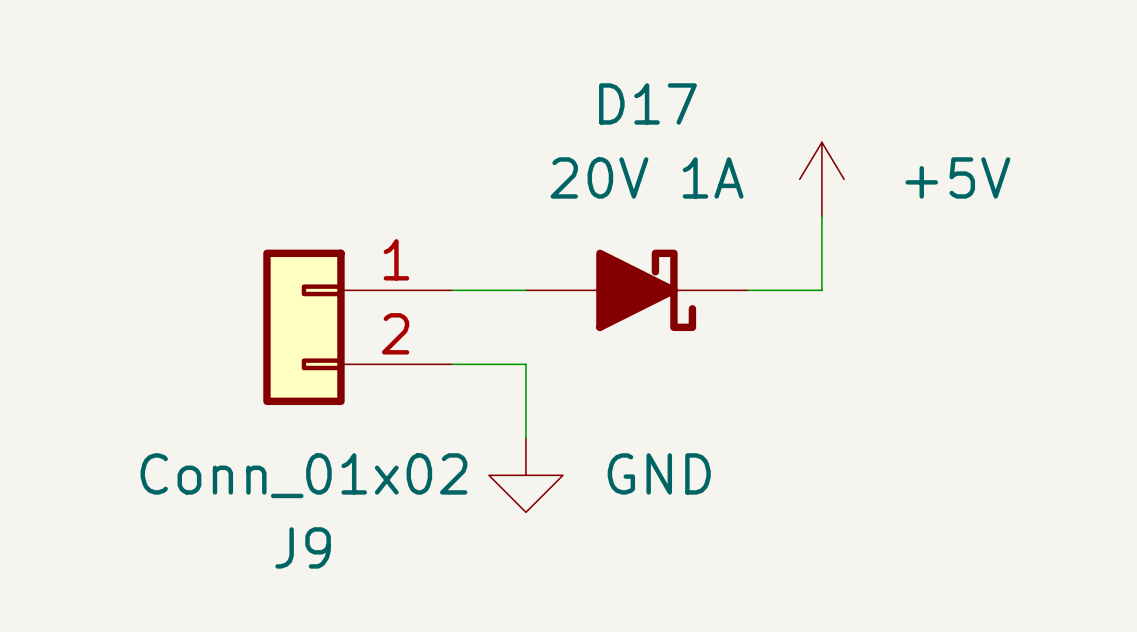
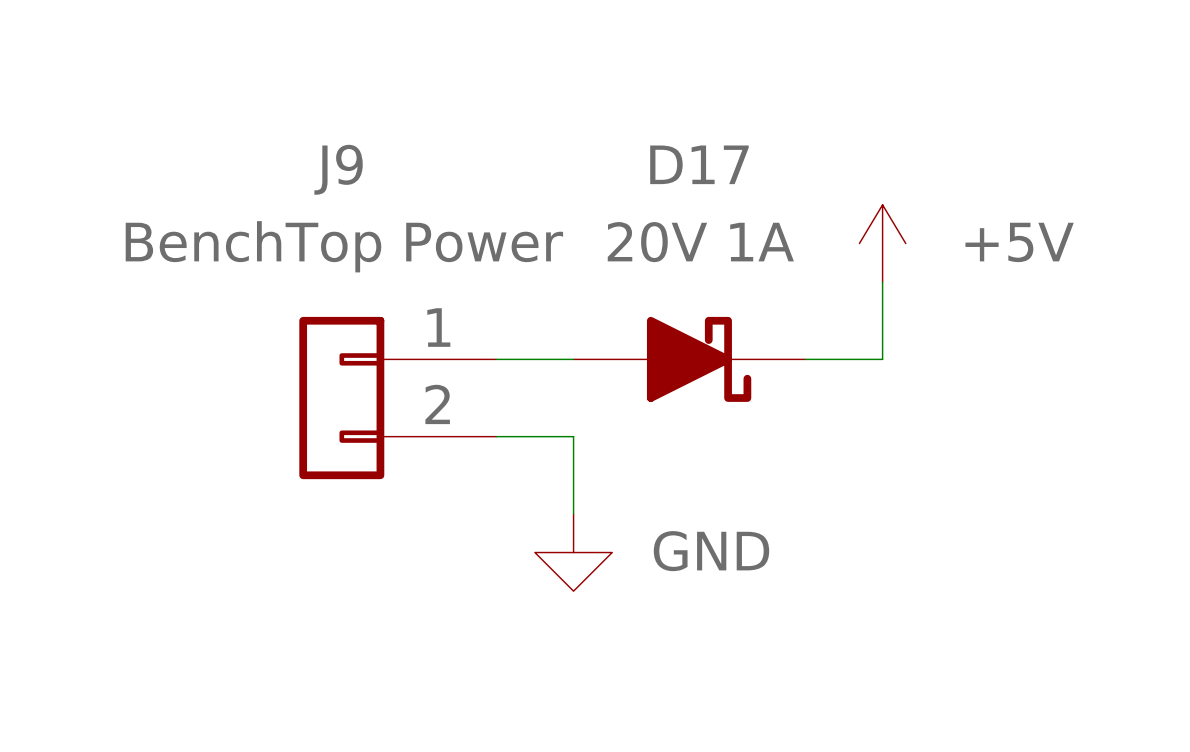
J9 value: Conn_01x02 (303, 475) -> BenchTop Power (344, 246)
J9 name position: J9 (303, 547) -> J9 (338, 169)

